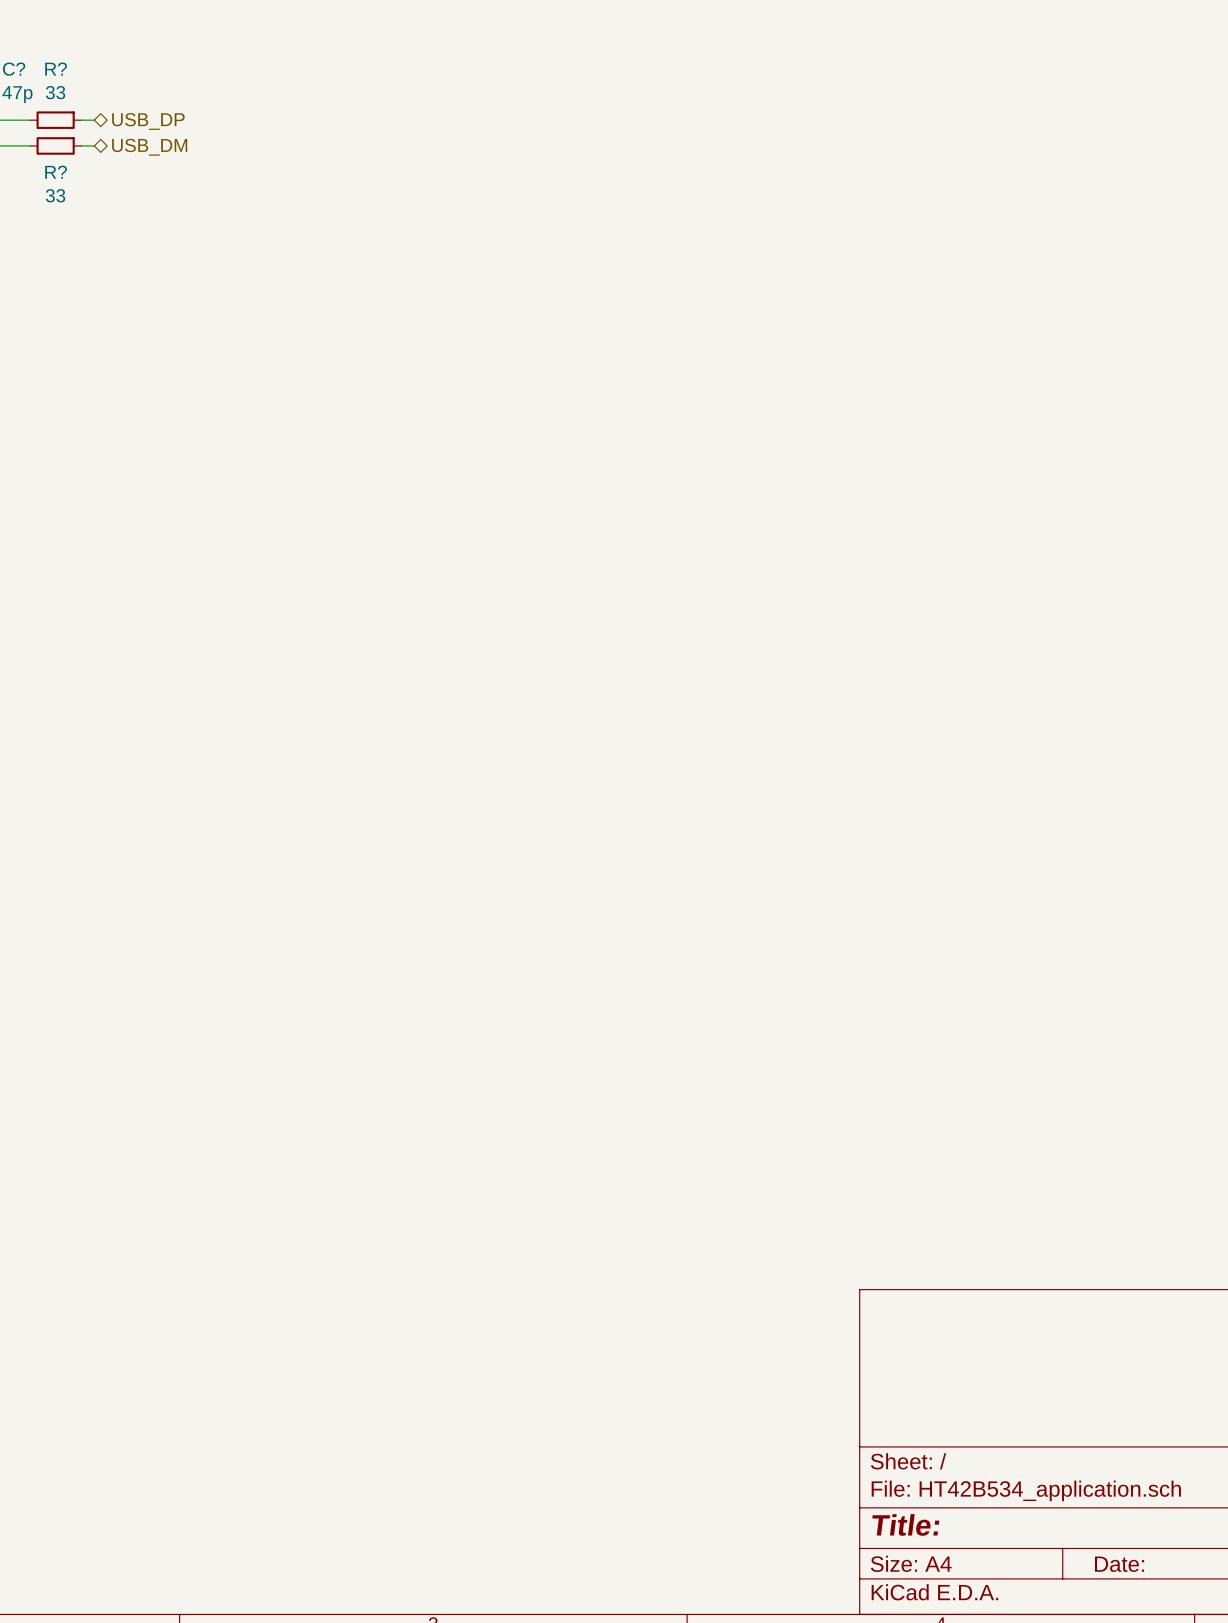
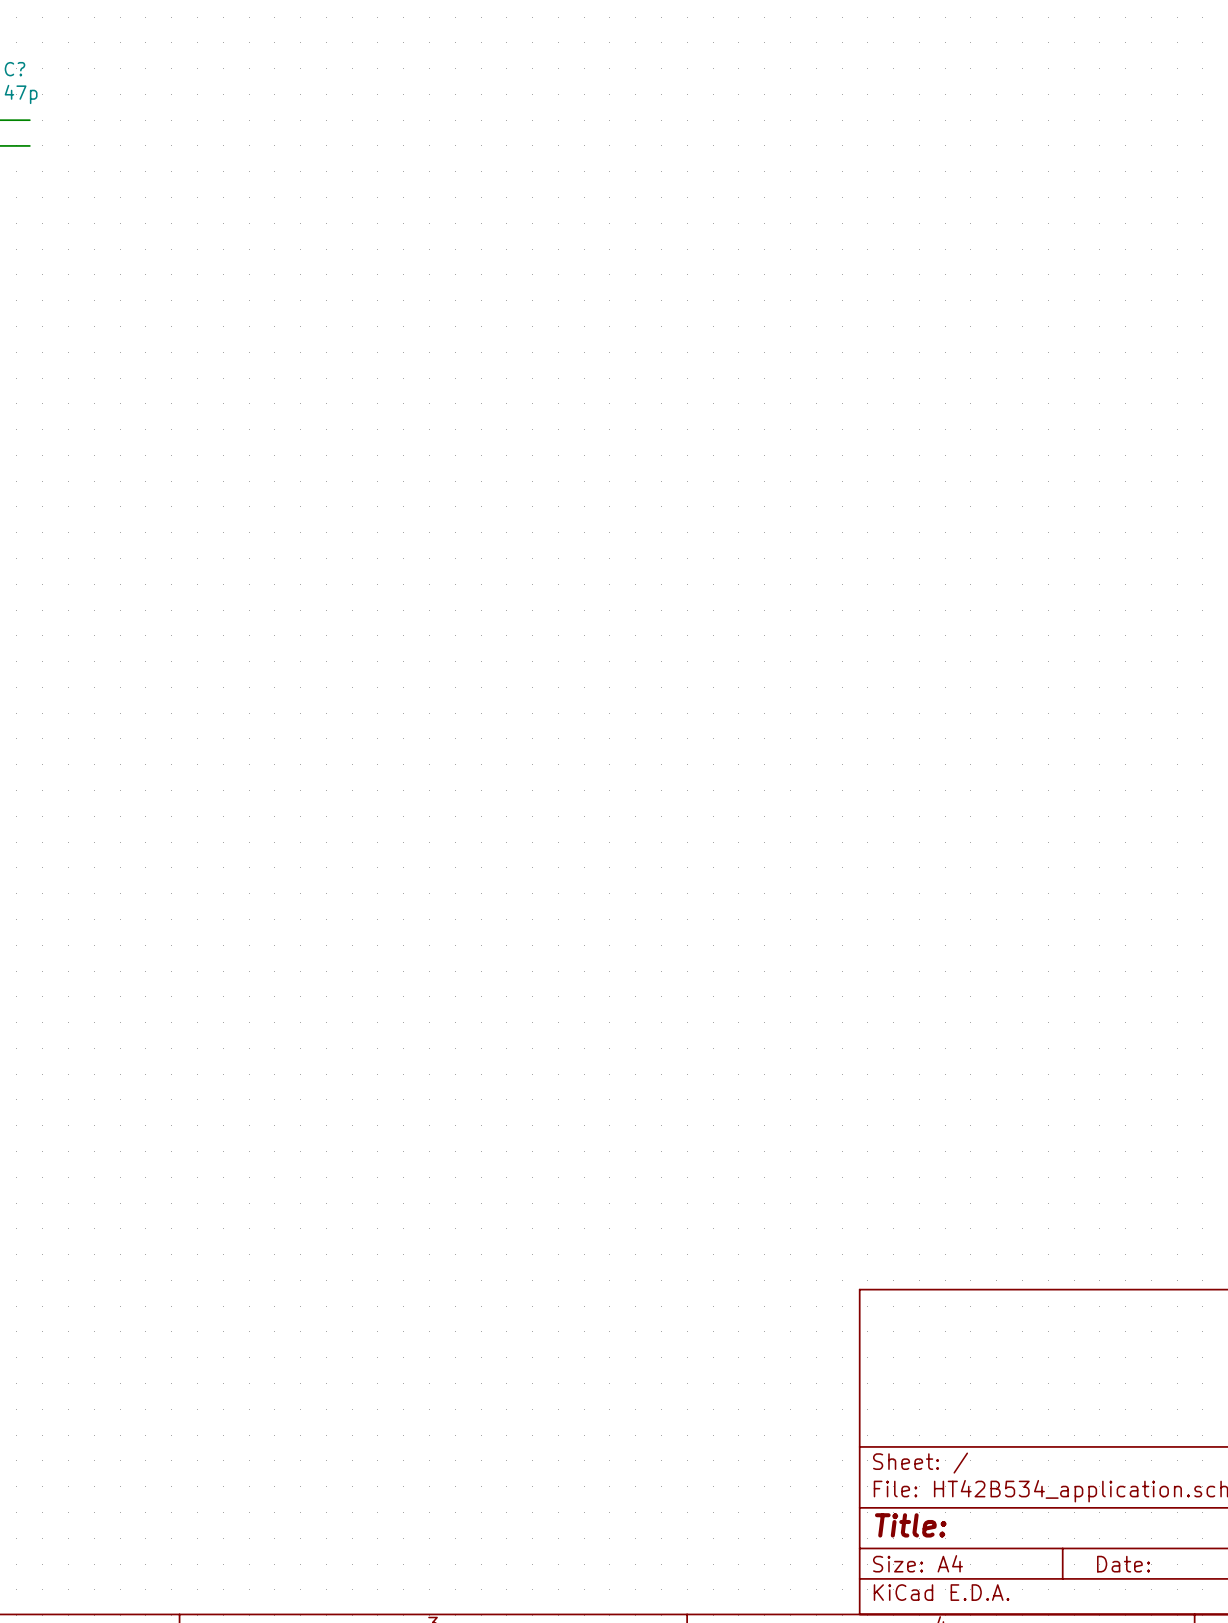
R?: 33 (55, 120) -> none
wire: (81, 120) (94, 120) -> none
hierarchical label: USB_DP (148, 121) -> none
R?: 33 (55, 145) -> none
wire: (81, 145) (94, 145) -> none
hierarchical label: USB_DM (149, 147) -> none

